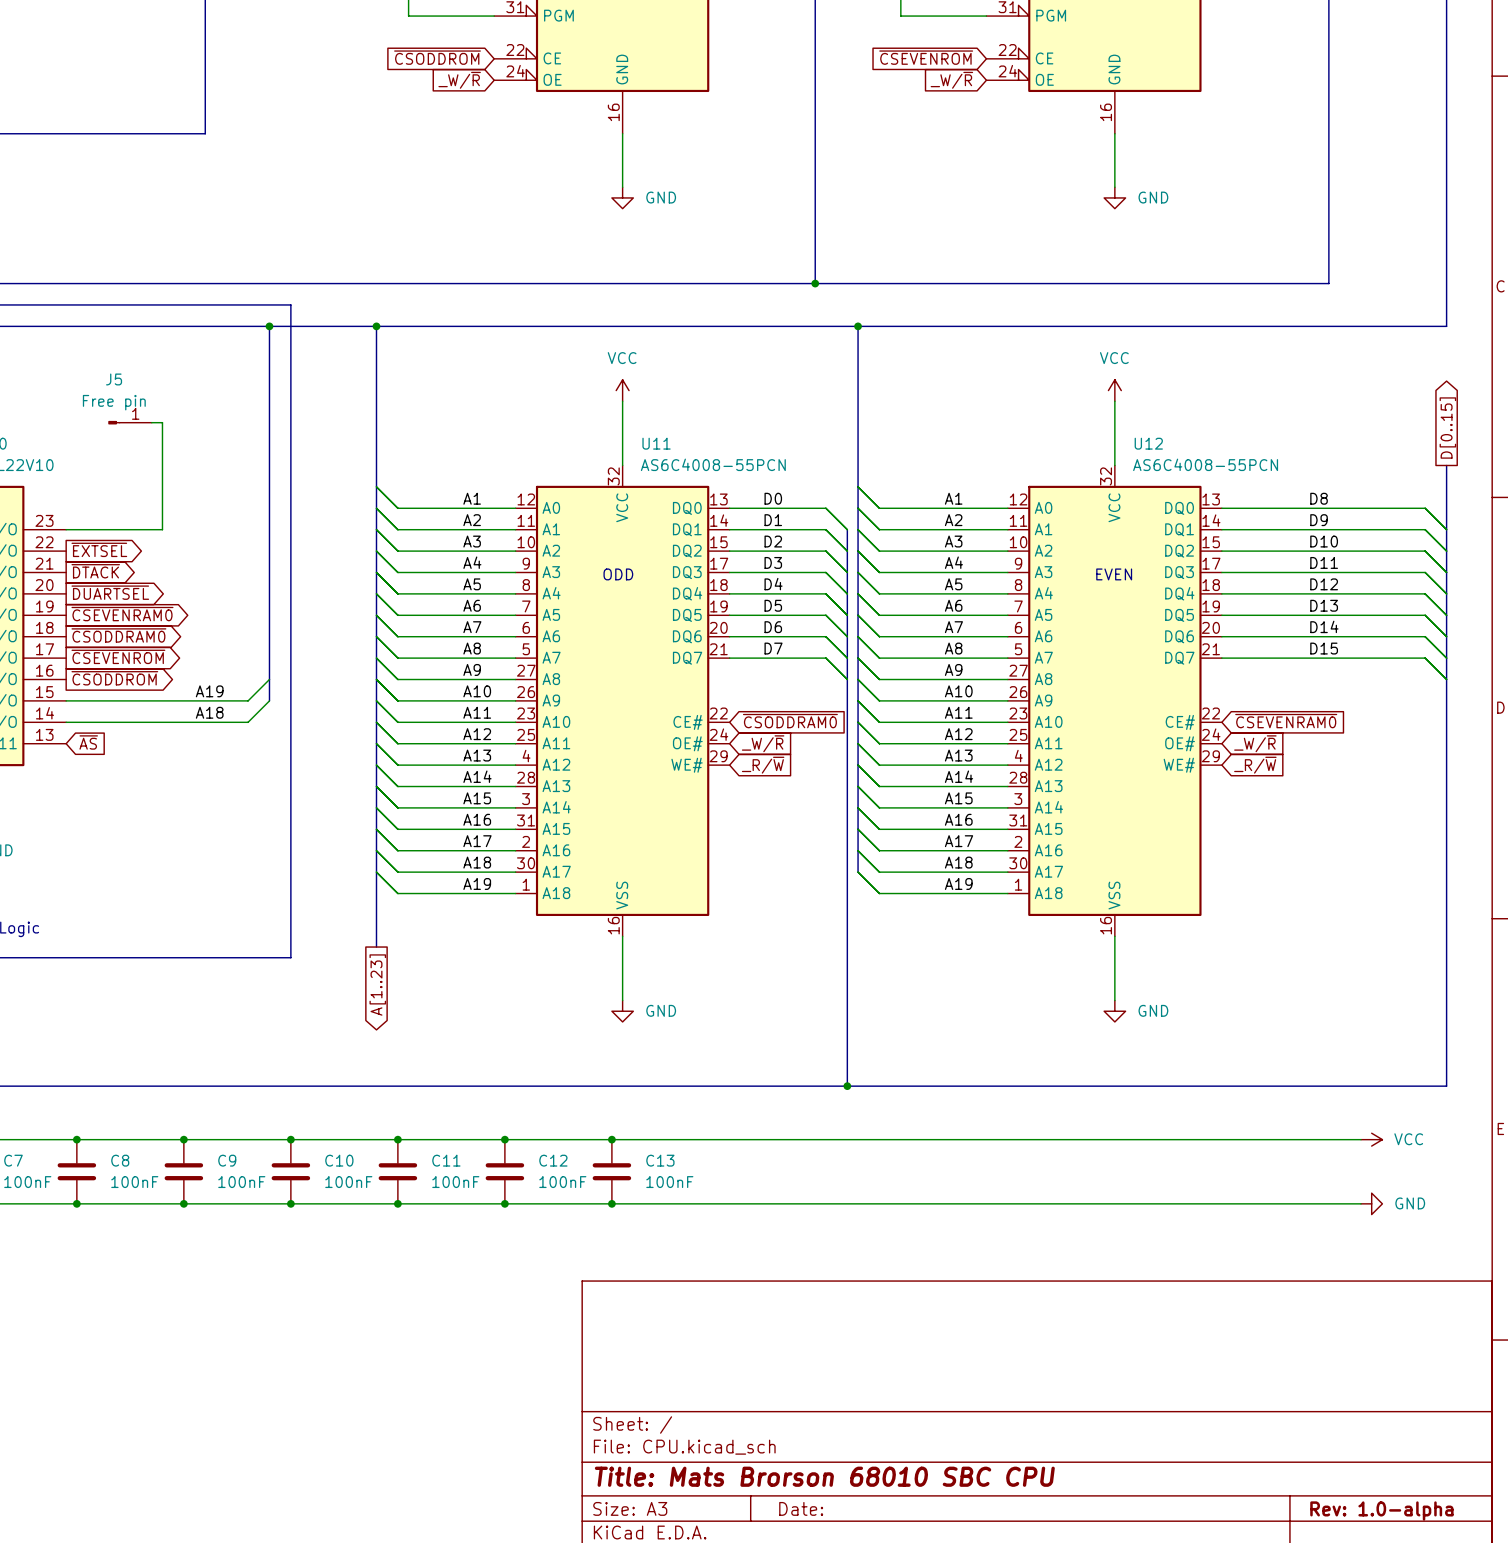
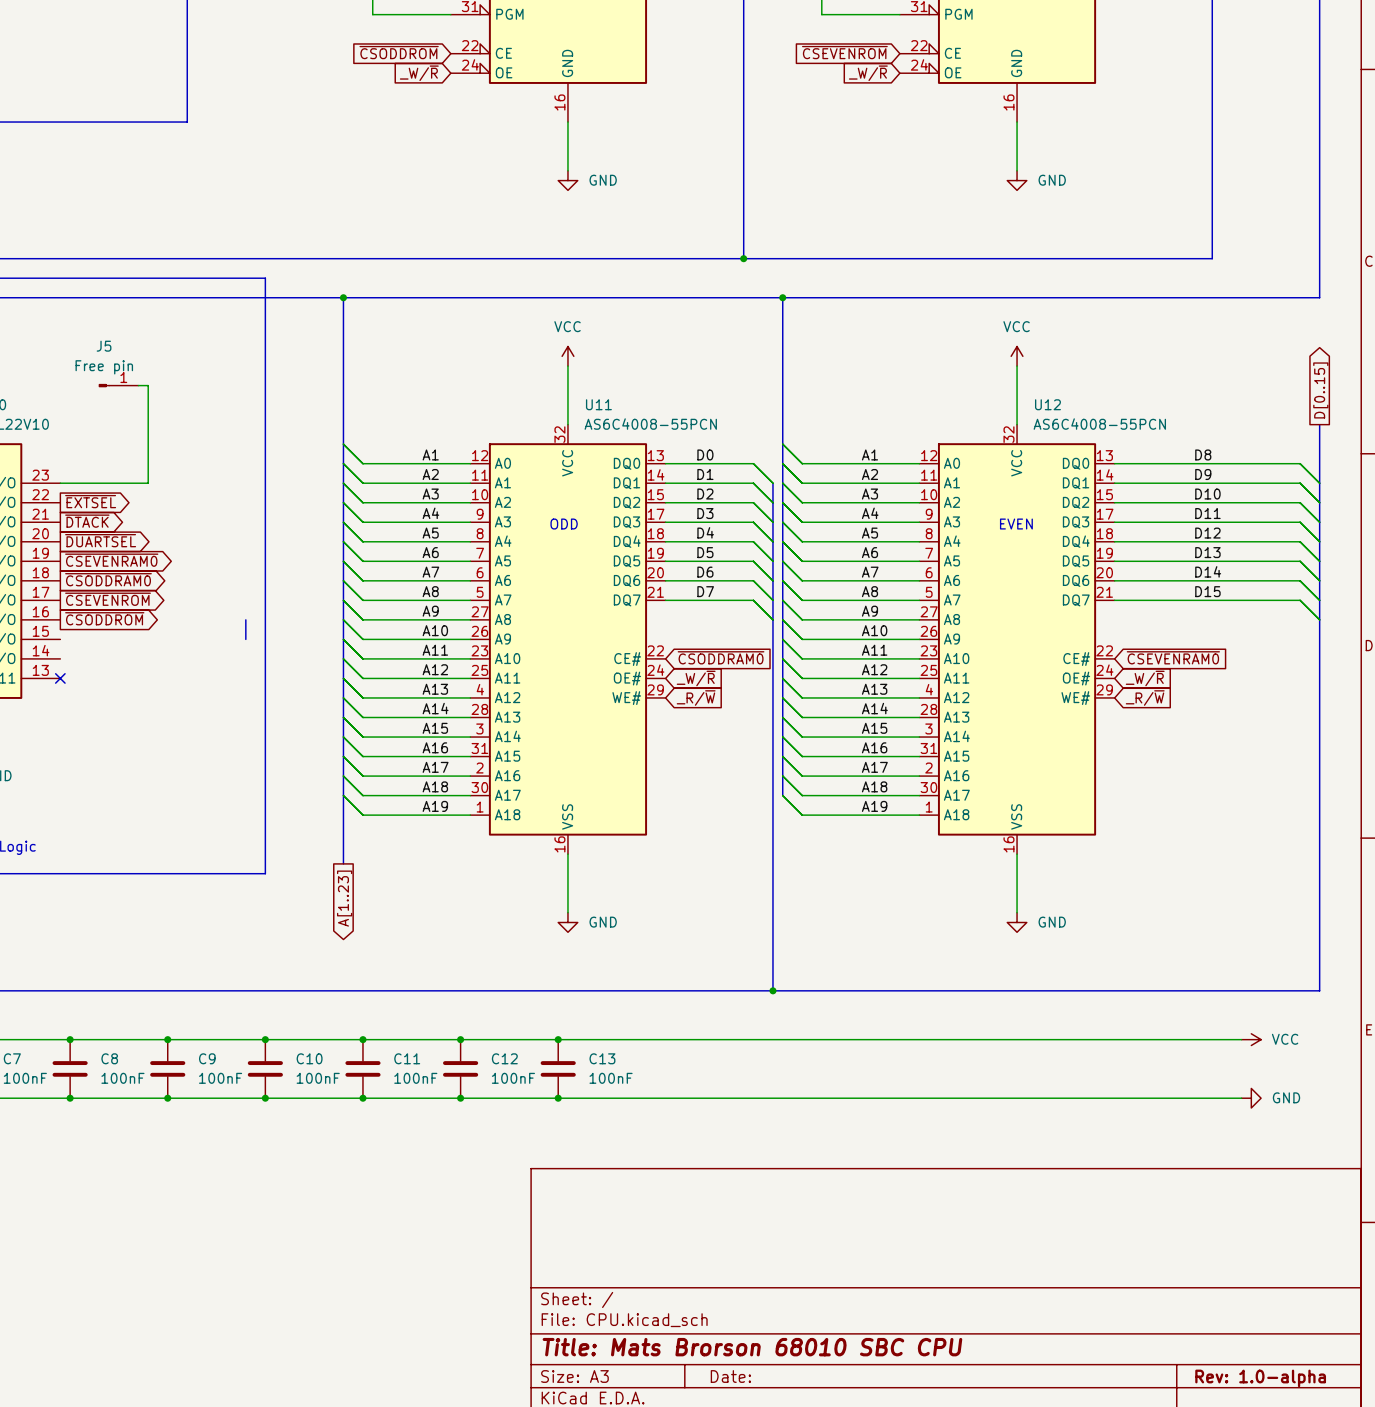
bus: (269, 326) (269, 679) -> none
junction: (269, 326) -> none
wire: (269, 679) (248, 700) (66, 700) -> none
label: A19 (209, 691) -> none
wire: (269, 700) (248, 722) (66, 722) -> none
label: A18 (209, 712) -> none
global label: ~{AS} (88, 742) -> none
no-connect mark: none -> (60, 678)

